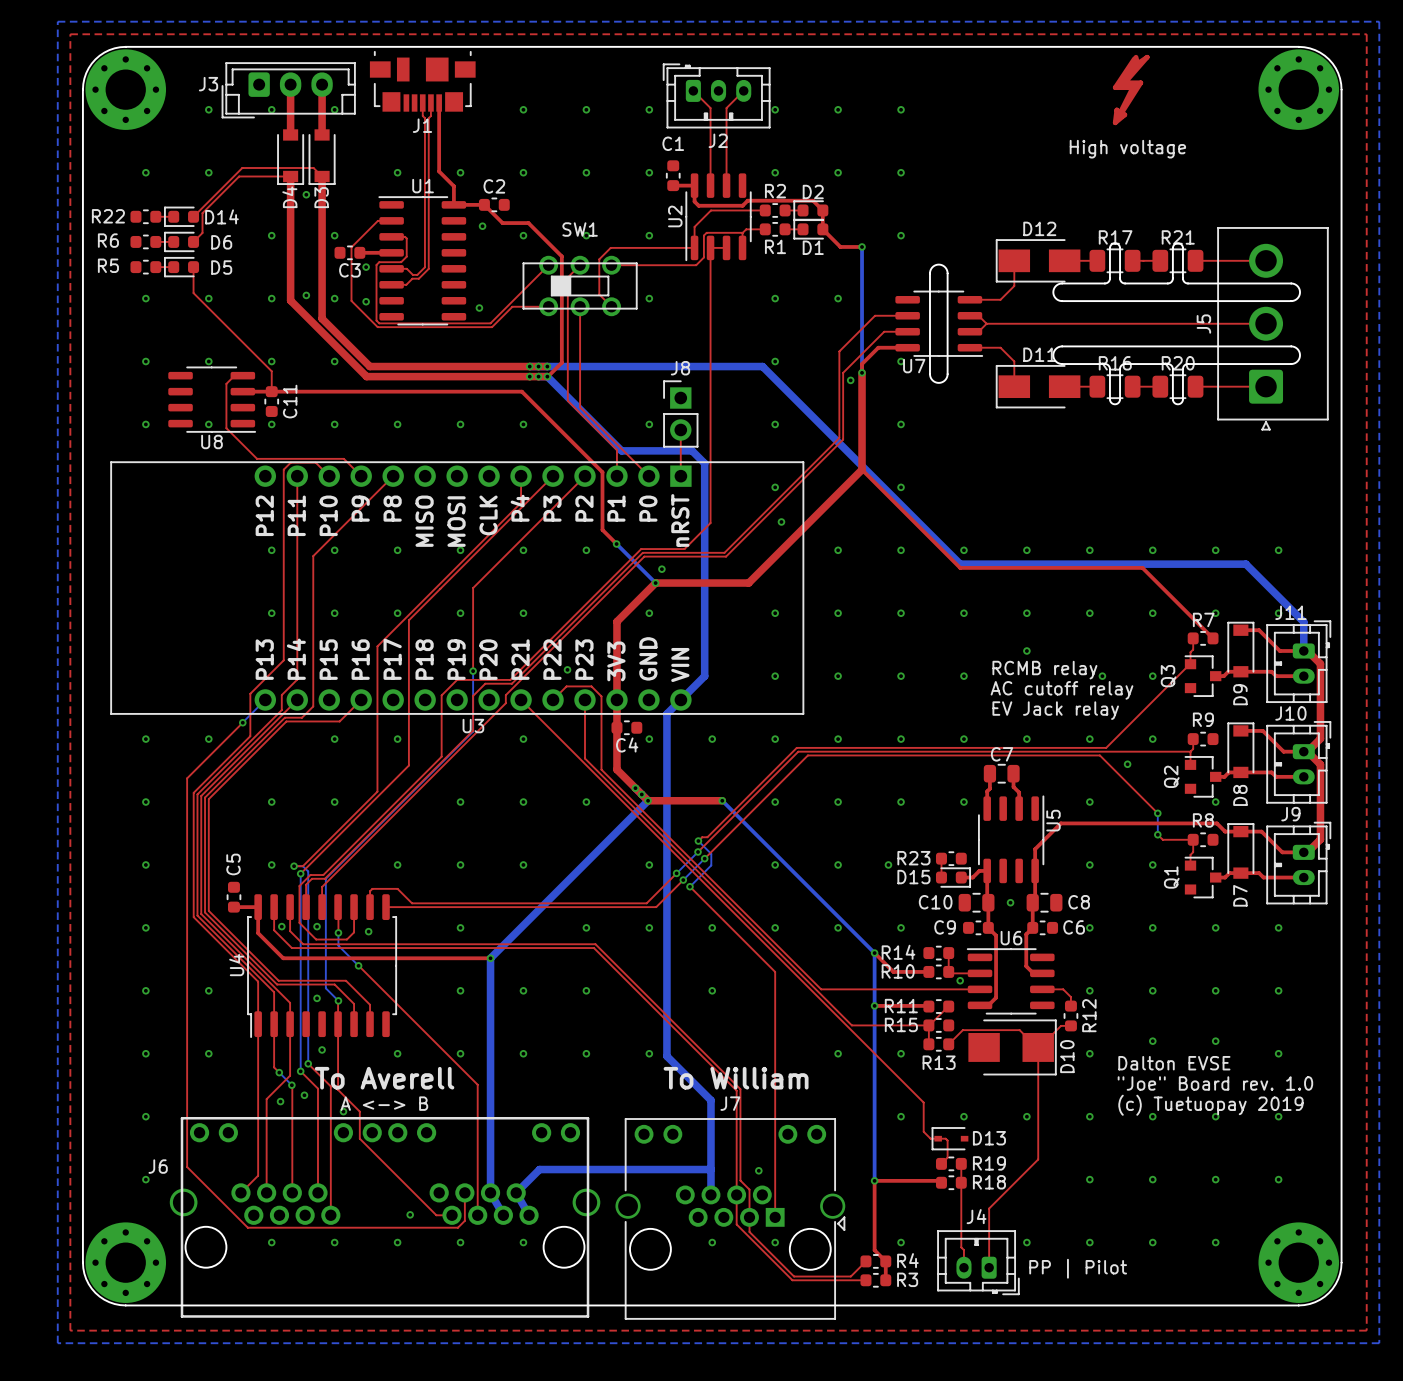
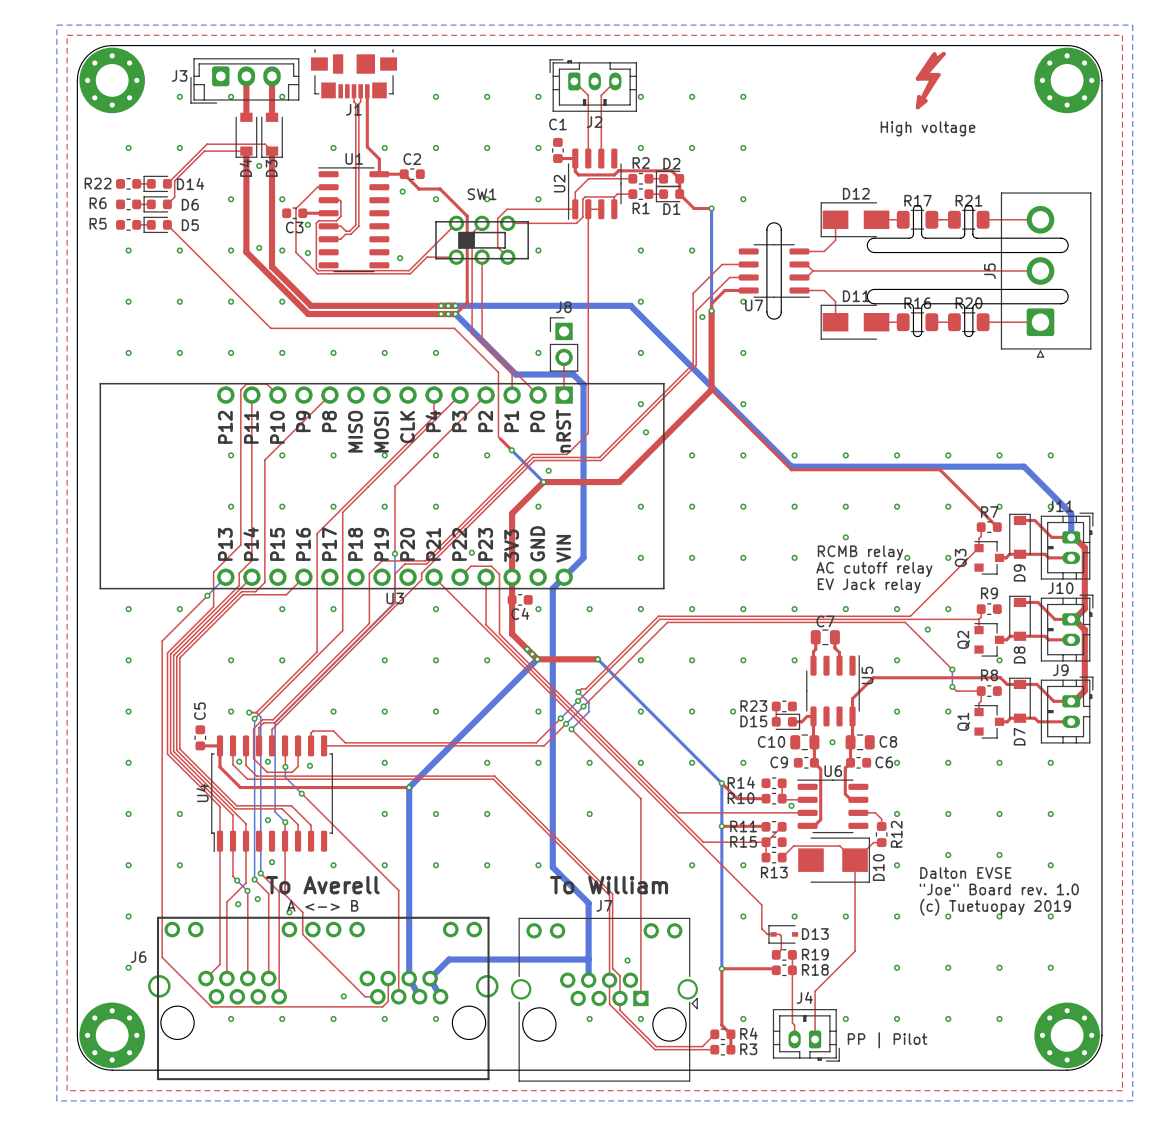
top track: (193, 267) (193, 293) (271, 371) (271, 391) -> none
top track: (242, 375) (234, 375) (226, 383) (226, 428) (257, 458) (343, 458) (361, 476) -> none
top track: (242, 391) (521, 391) (602, 472) (602, 529) -> (167, 224) (270, 328) (454, 328) (498, 372) (498, 436) (500, 438)
U8: (212, 399) -> none
C11: (271, 401) -> none

